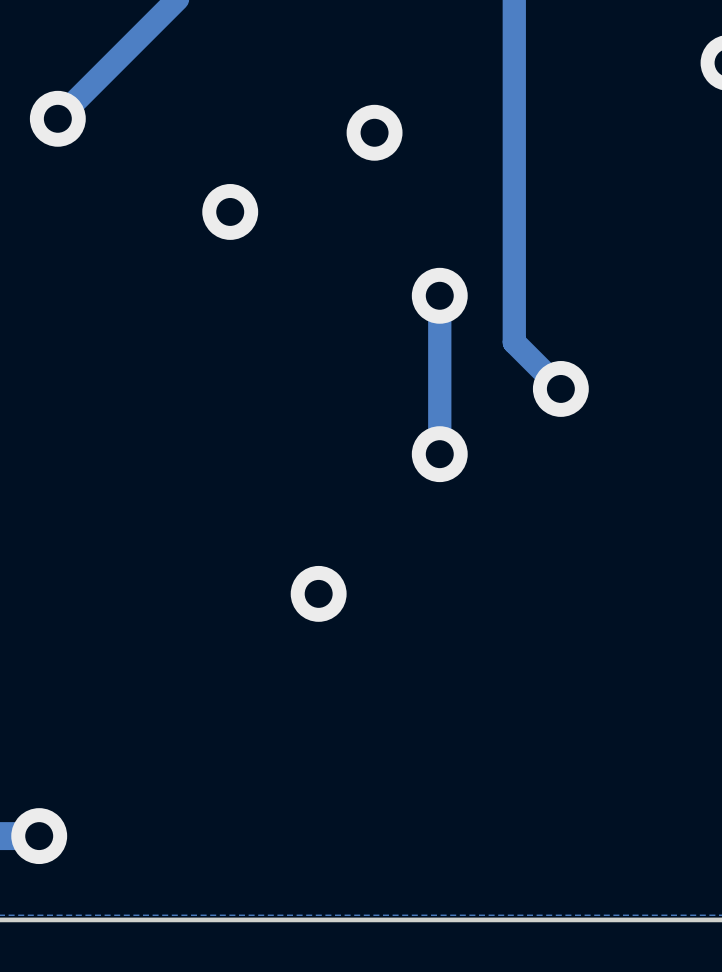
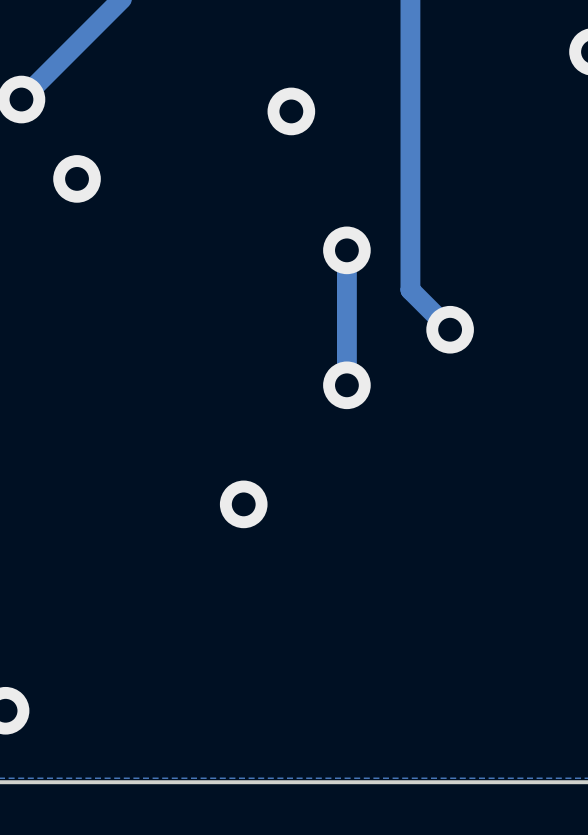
via position: (230, 211) -> (77, 178)

